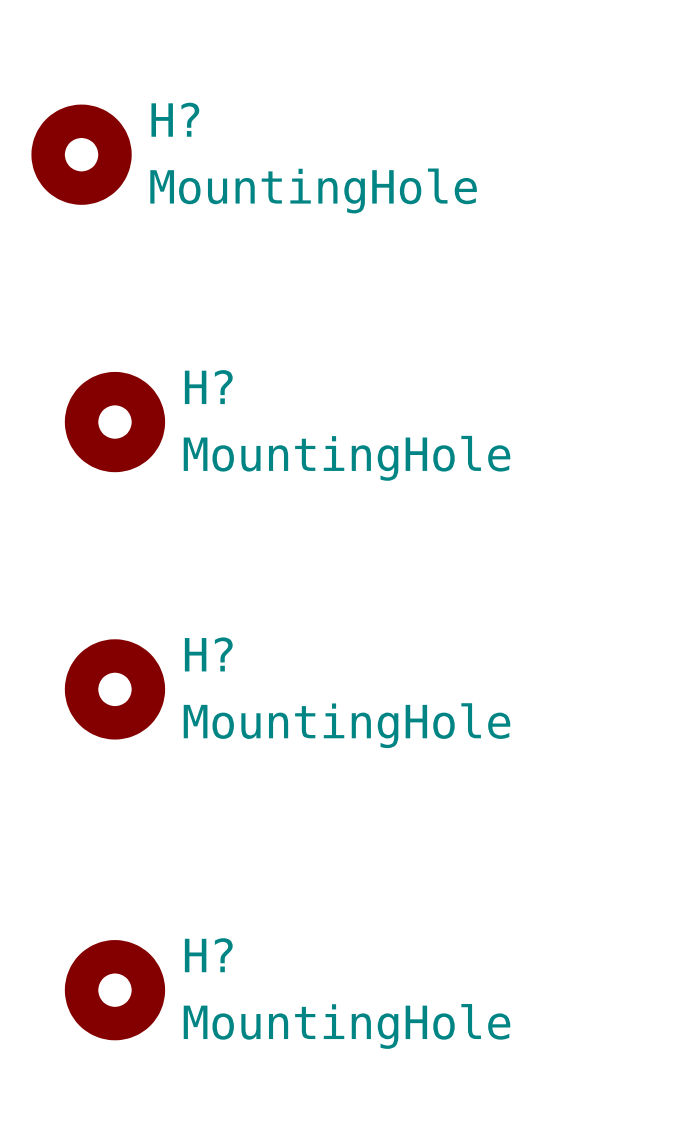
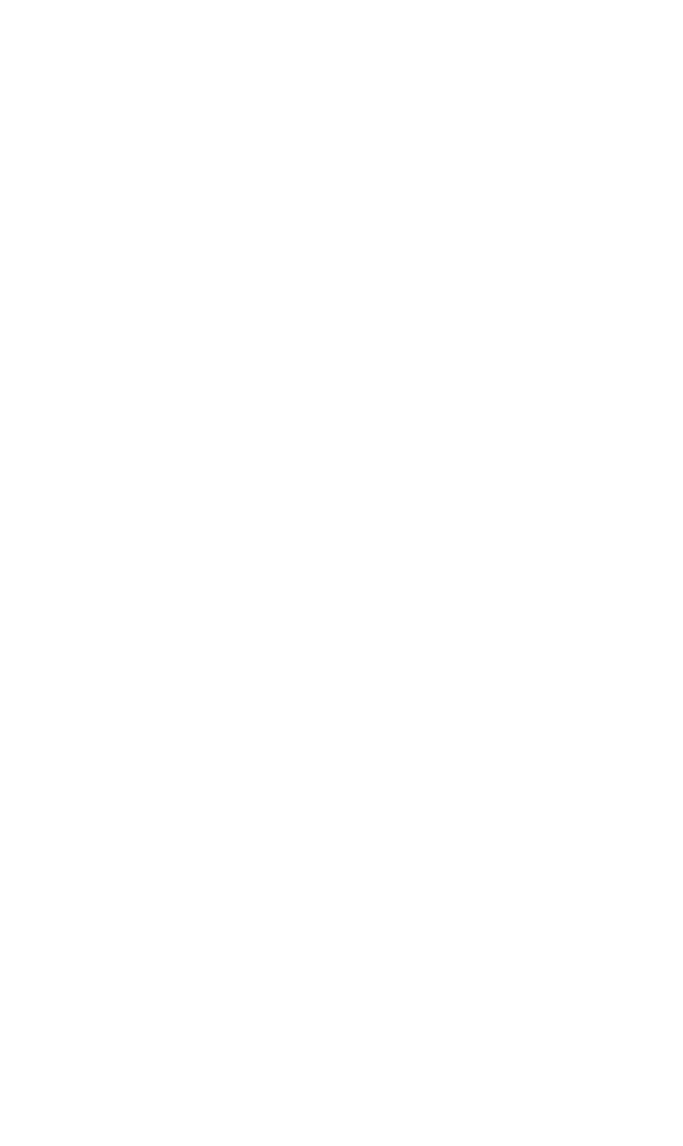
H?: MountingHole (81, 154) -> none
H?: MountingHole (114, 422) -> none
H?: MountingHole (114, 689) -> none
H?: MountingHole (114, 990) -> none

